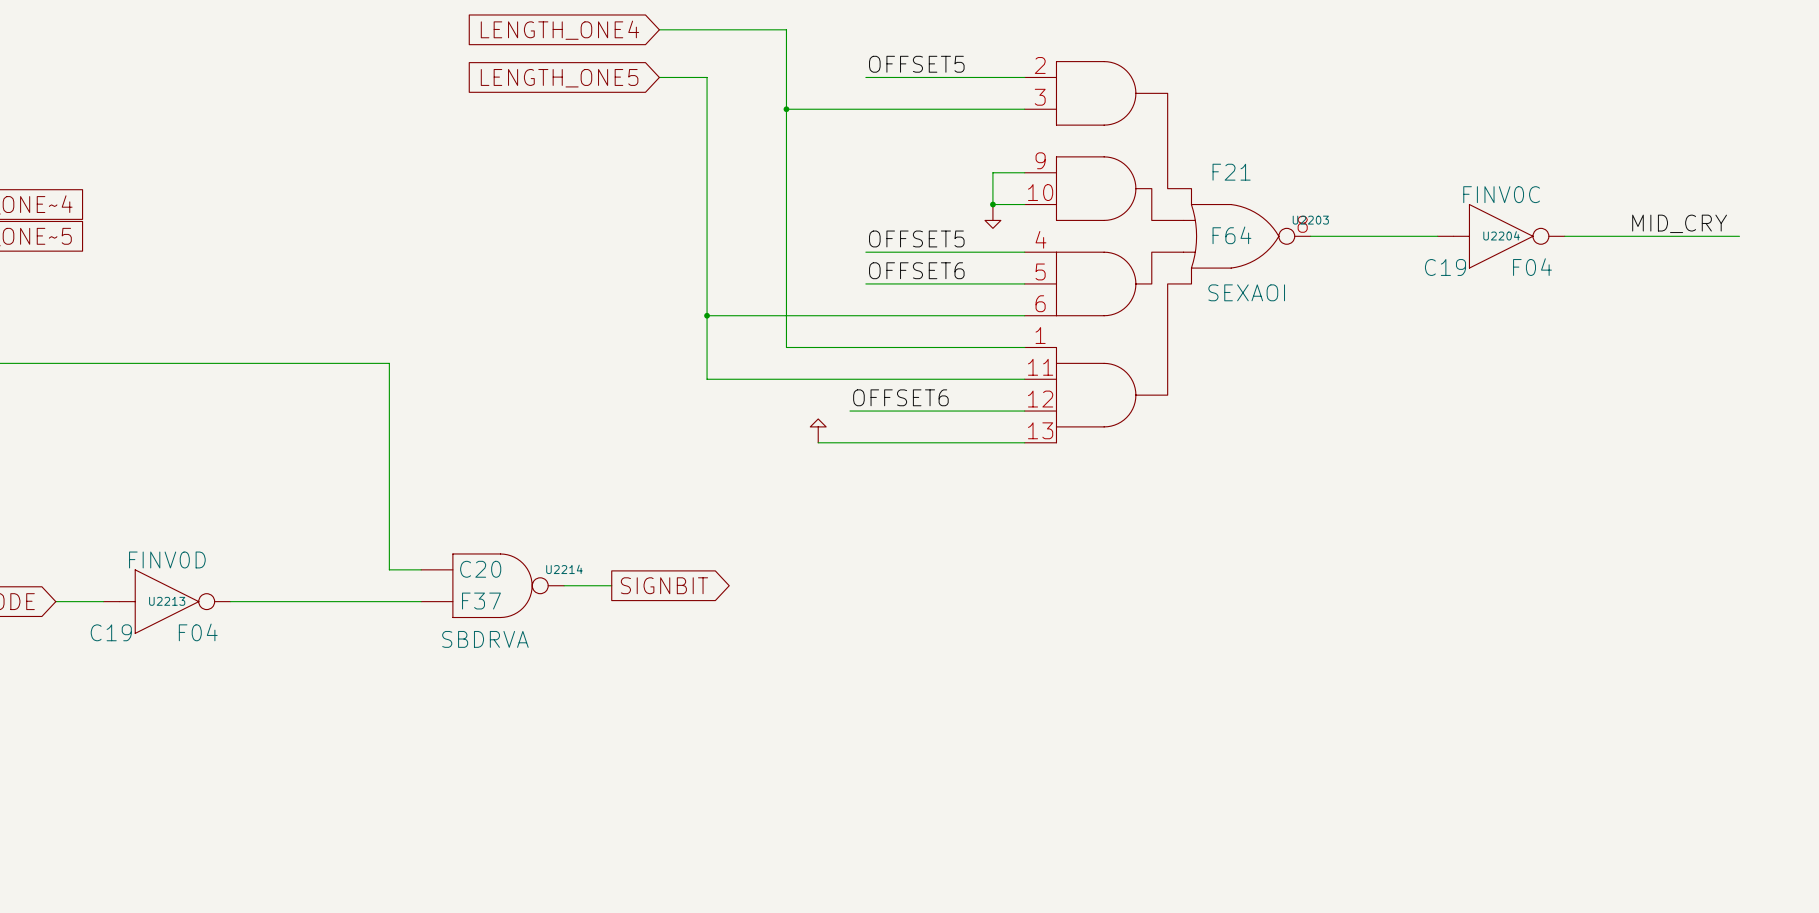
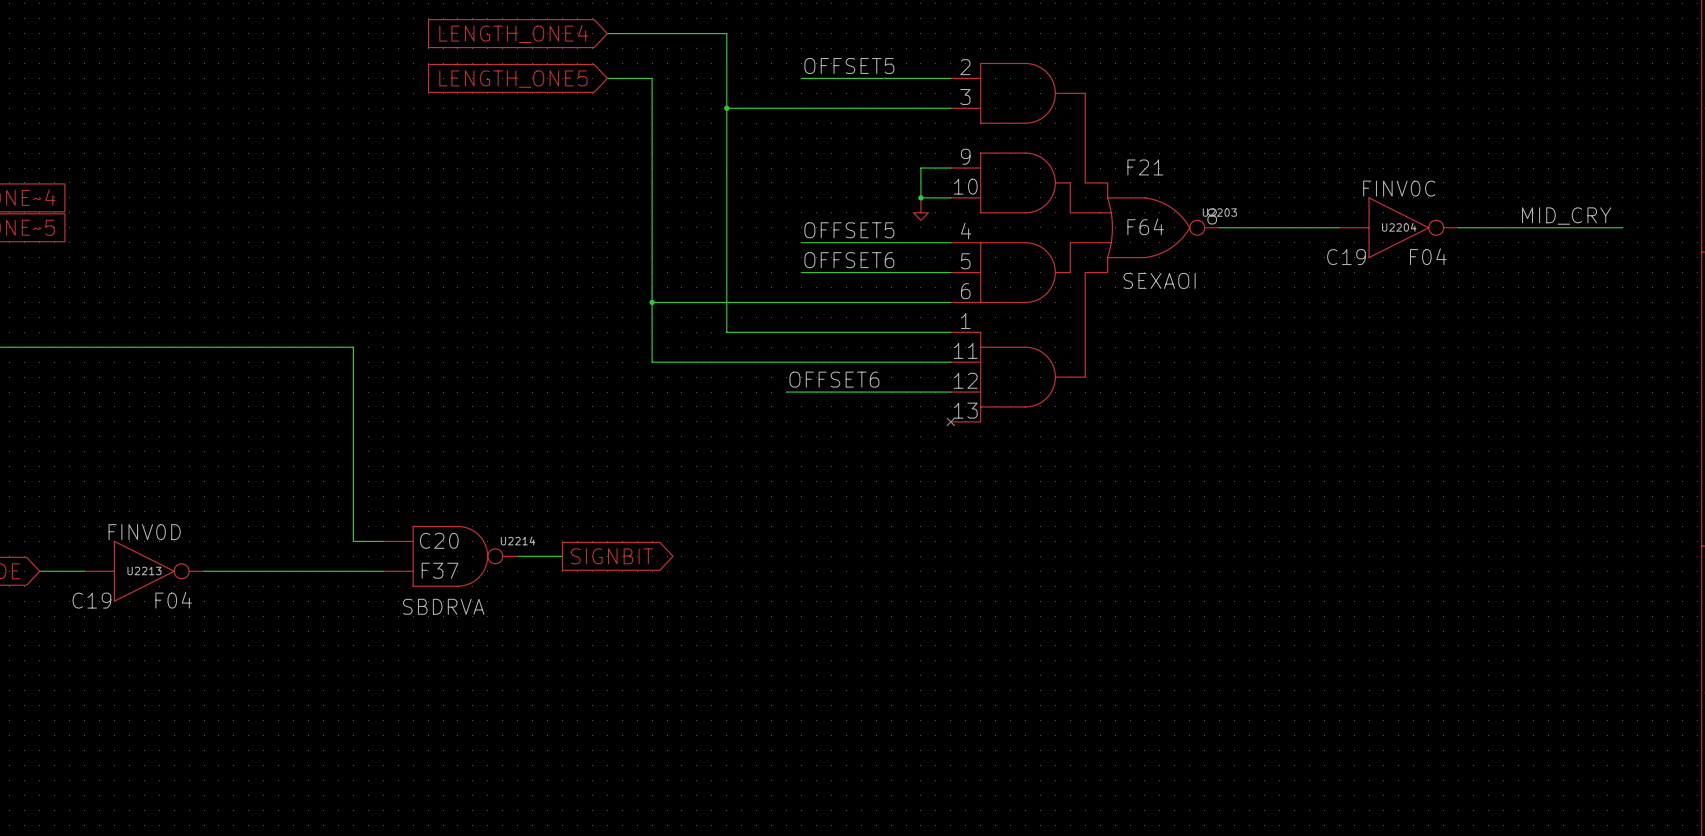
power symbol: (818, 430) -> none
wire: (818, 442) (1024, 442) -> none
no-connect mark: none -> (950, 421)

